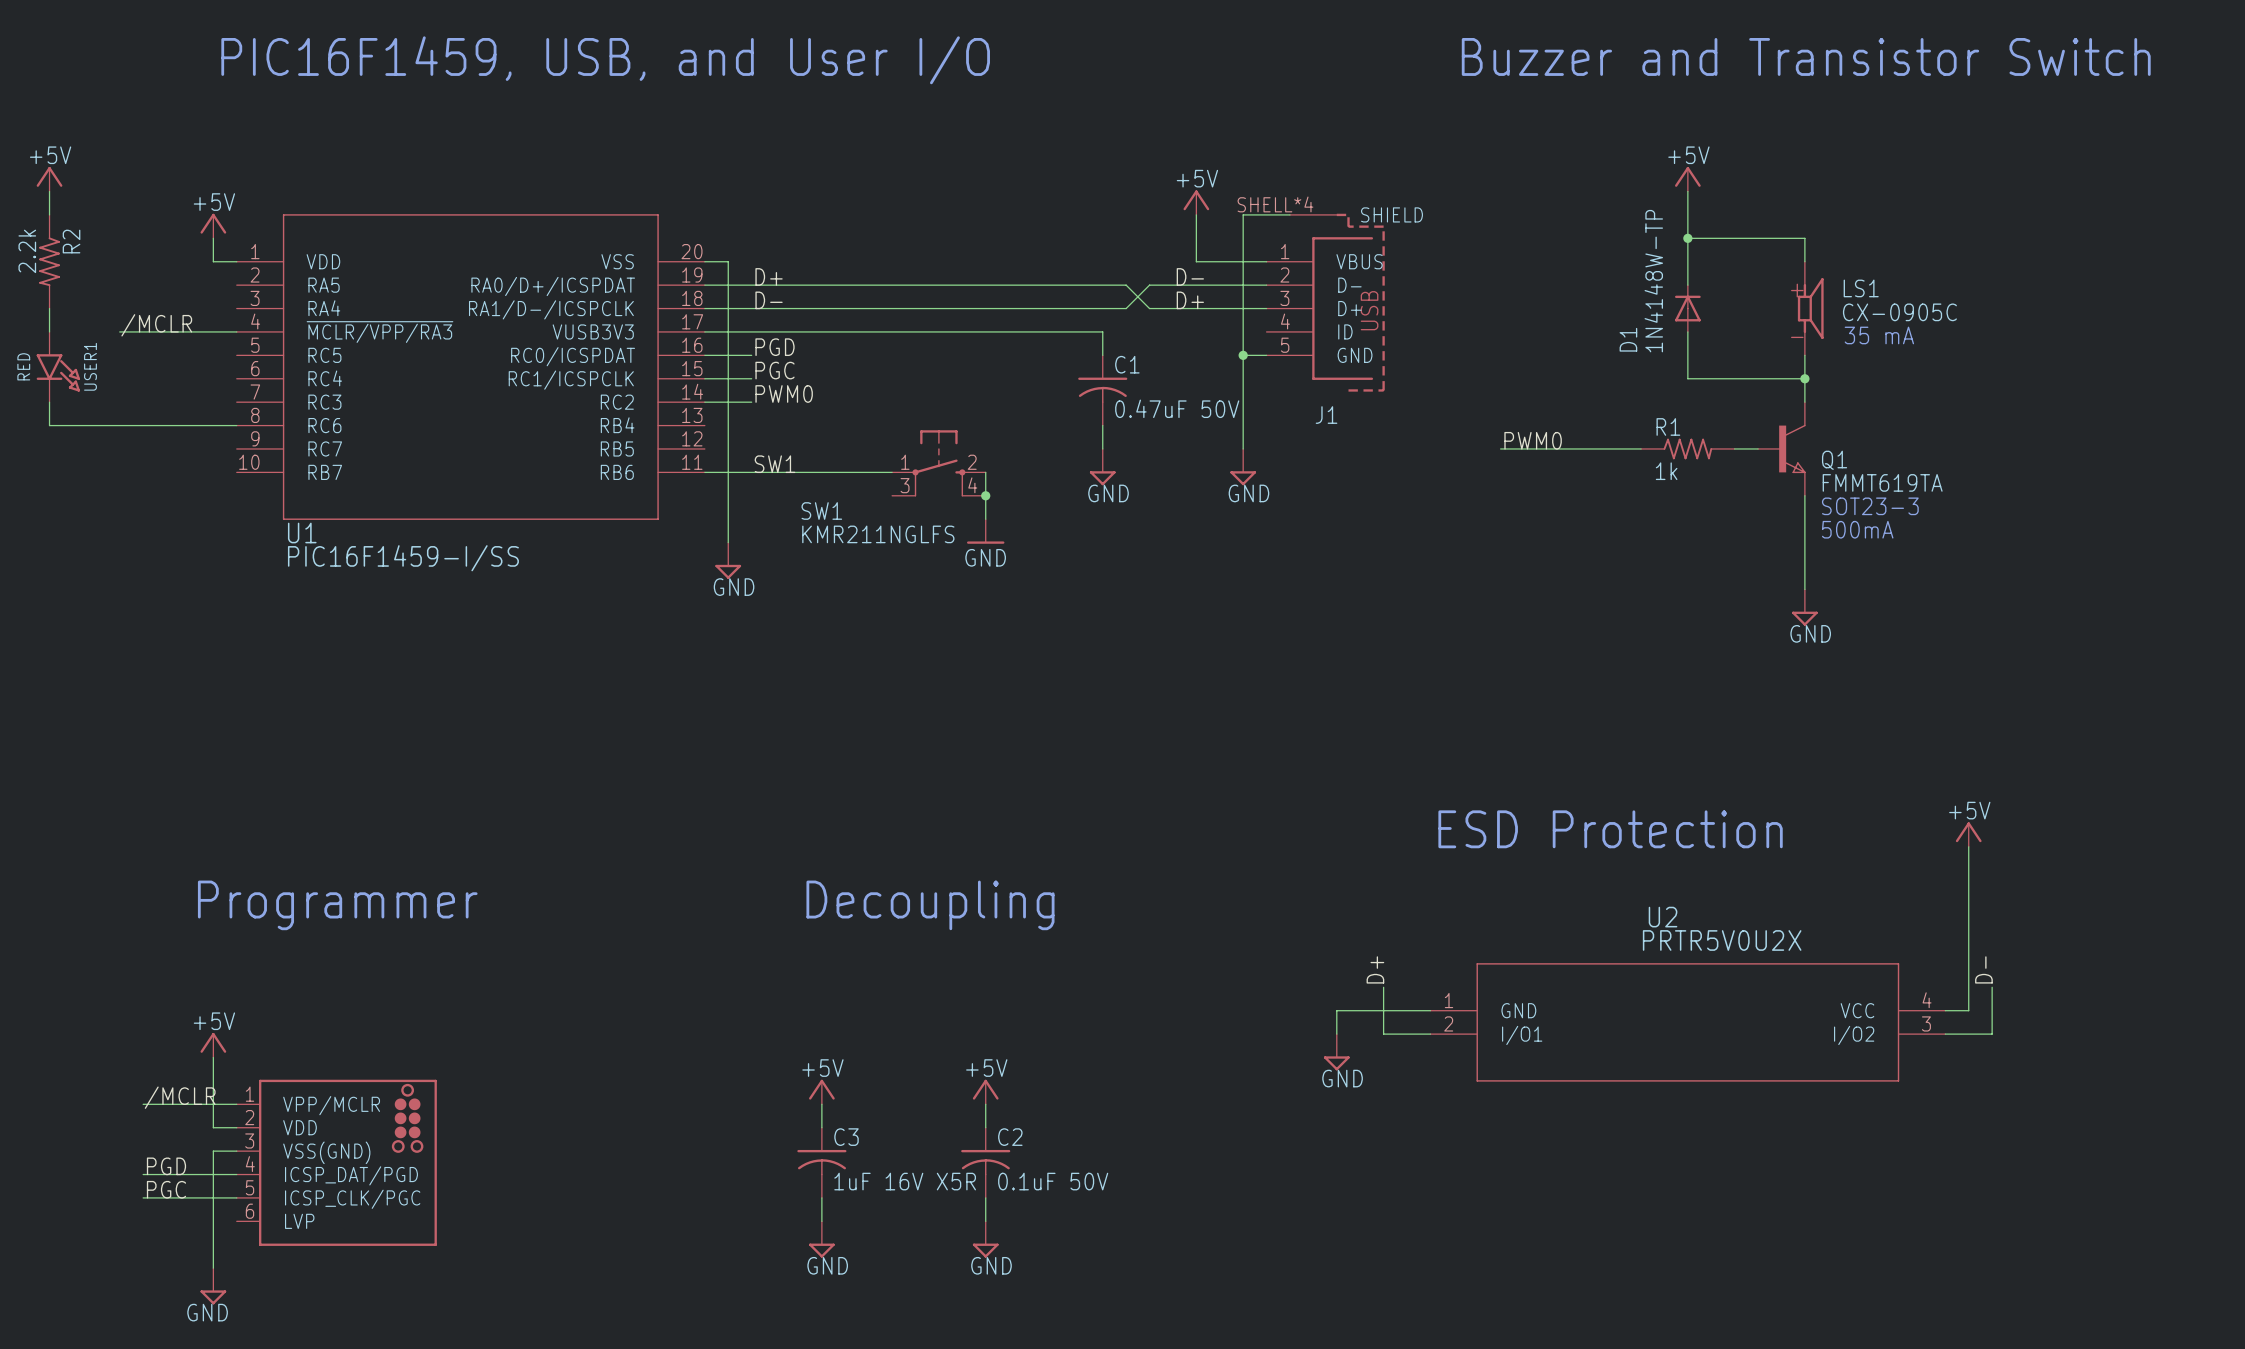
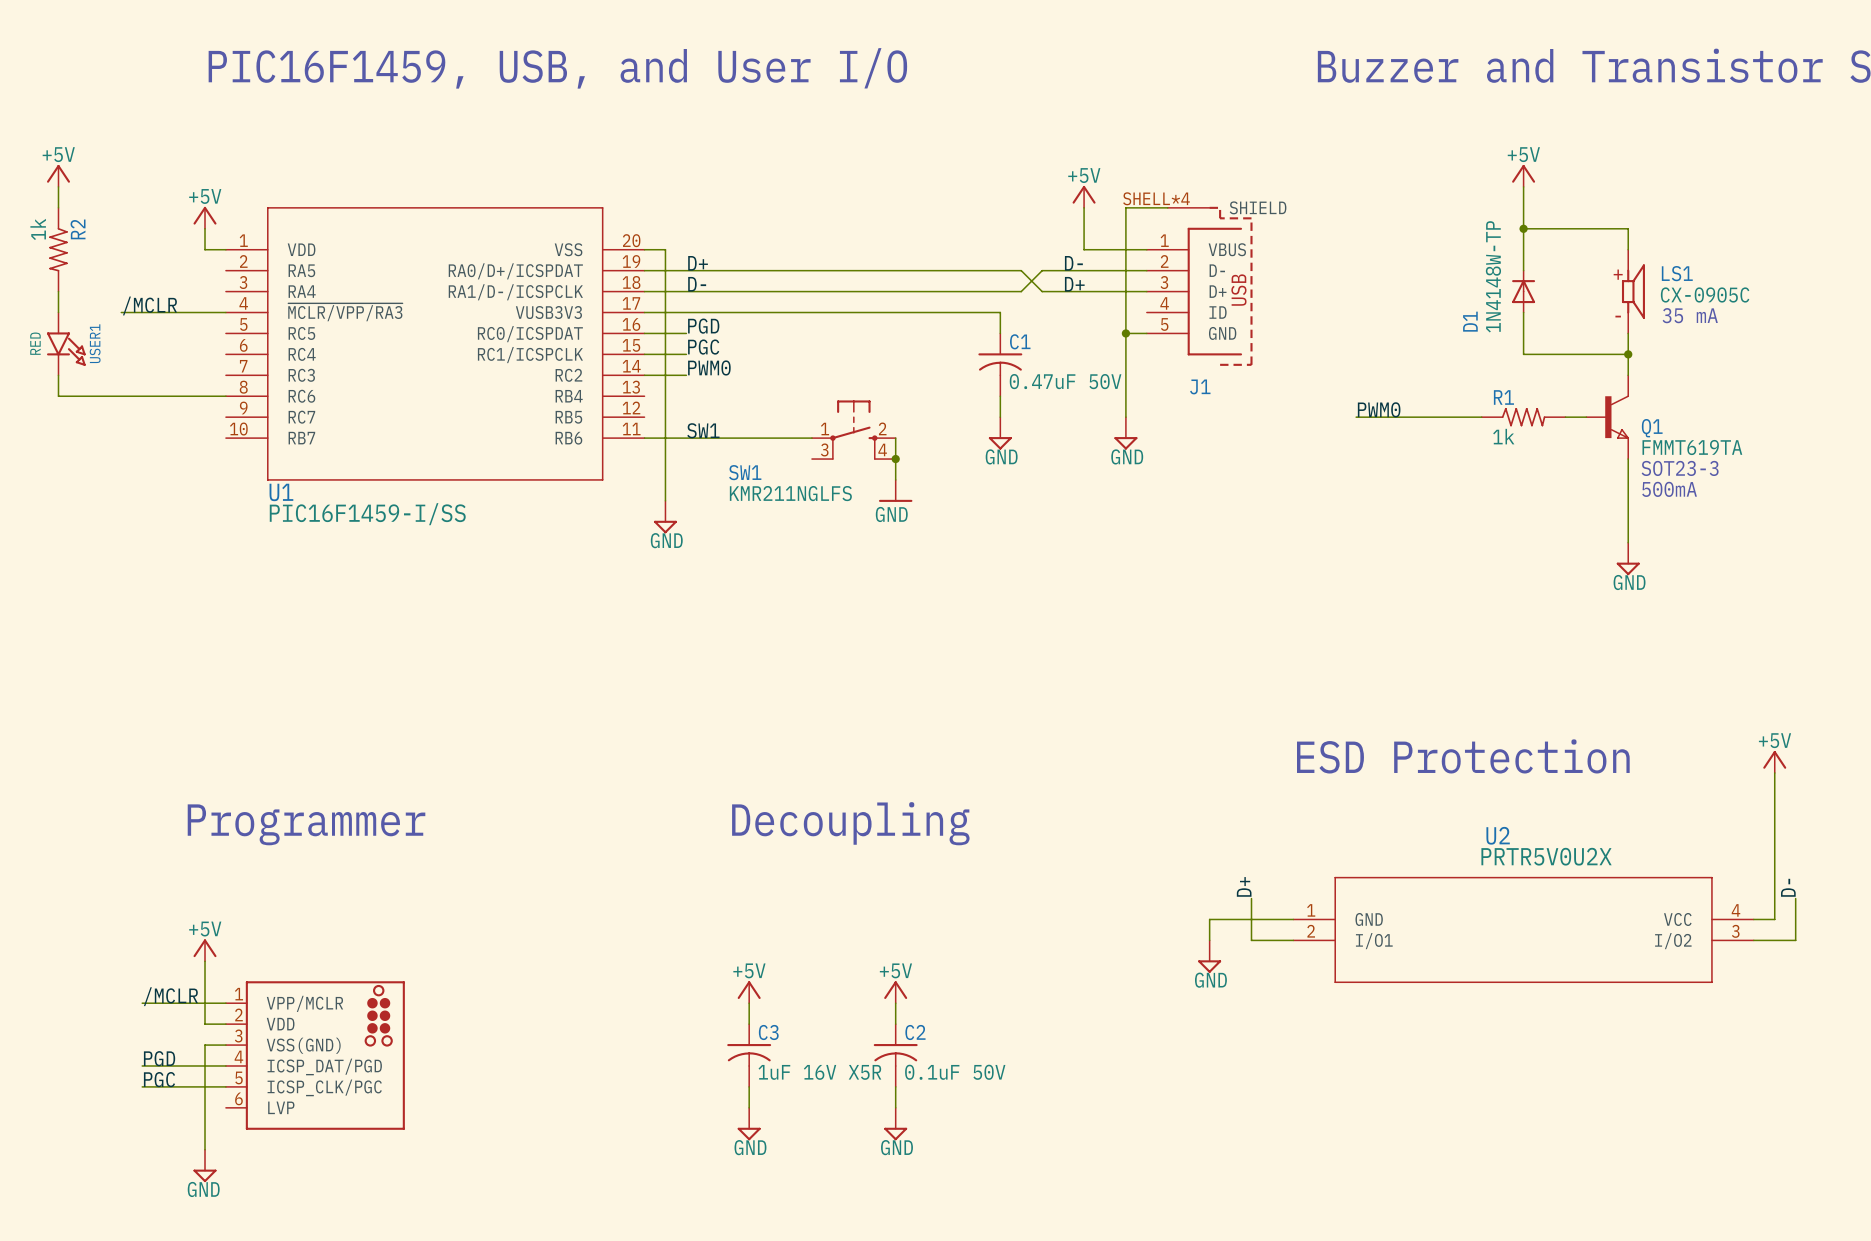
R2 value: 2.2k (27, 251) -> 1k (38, 229)

